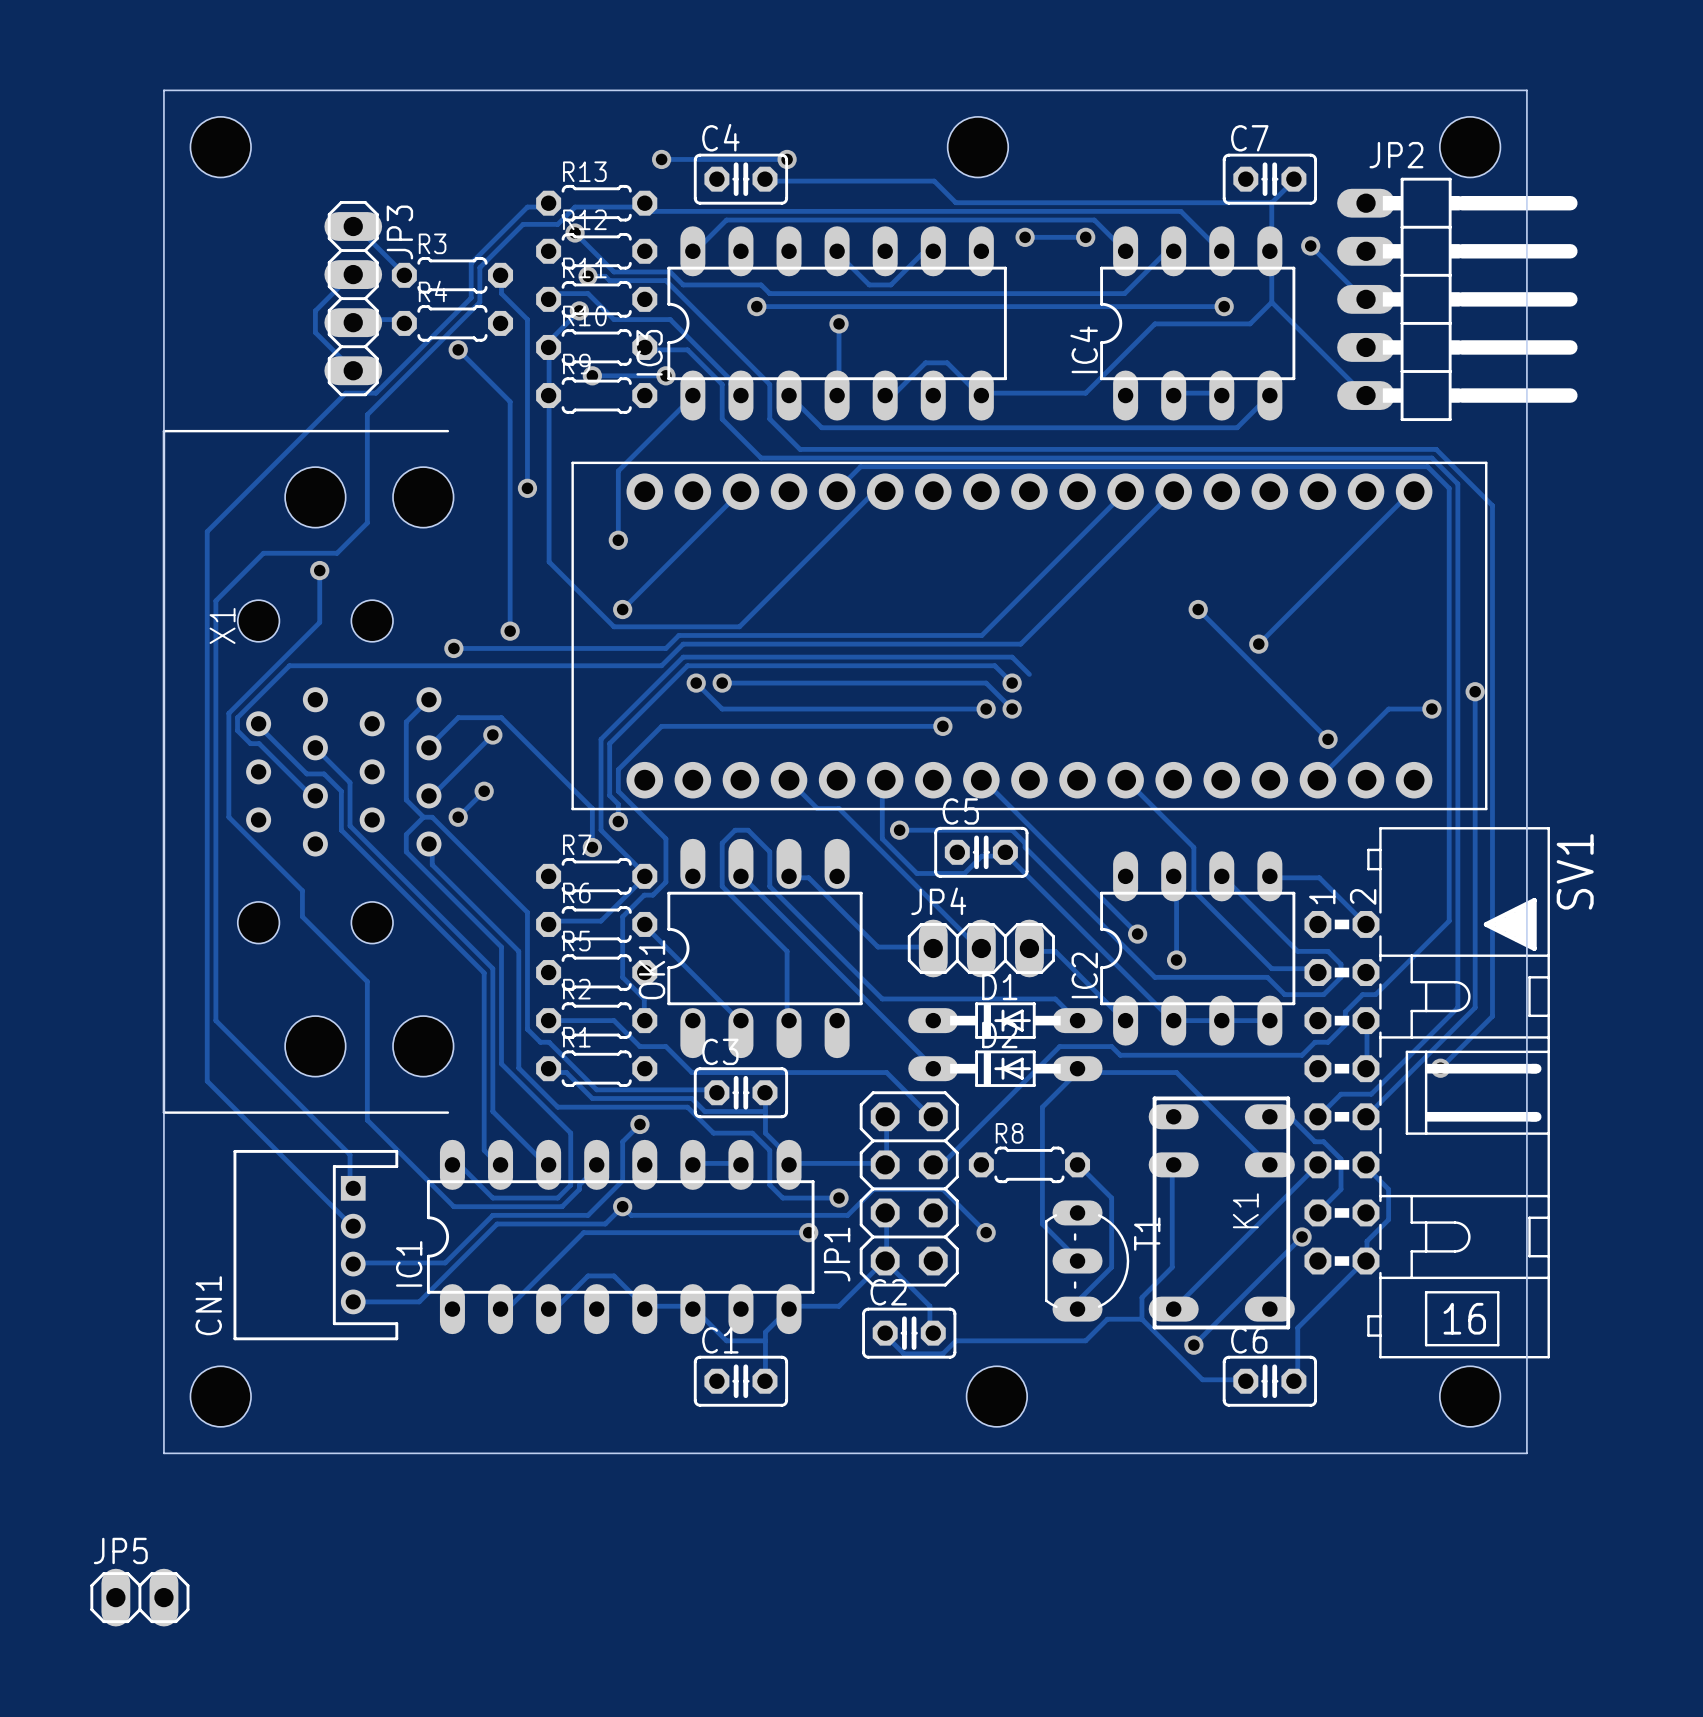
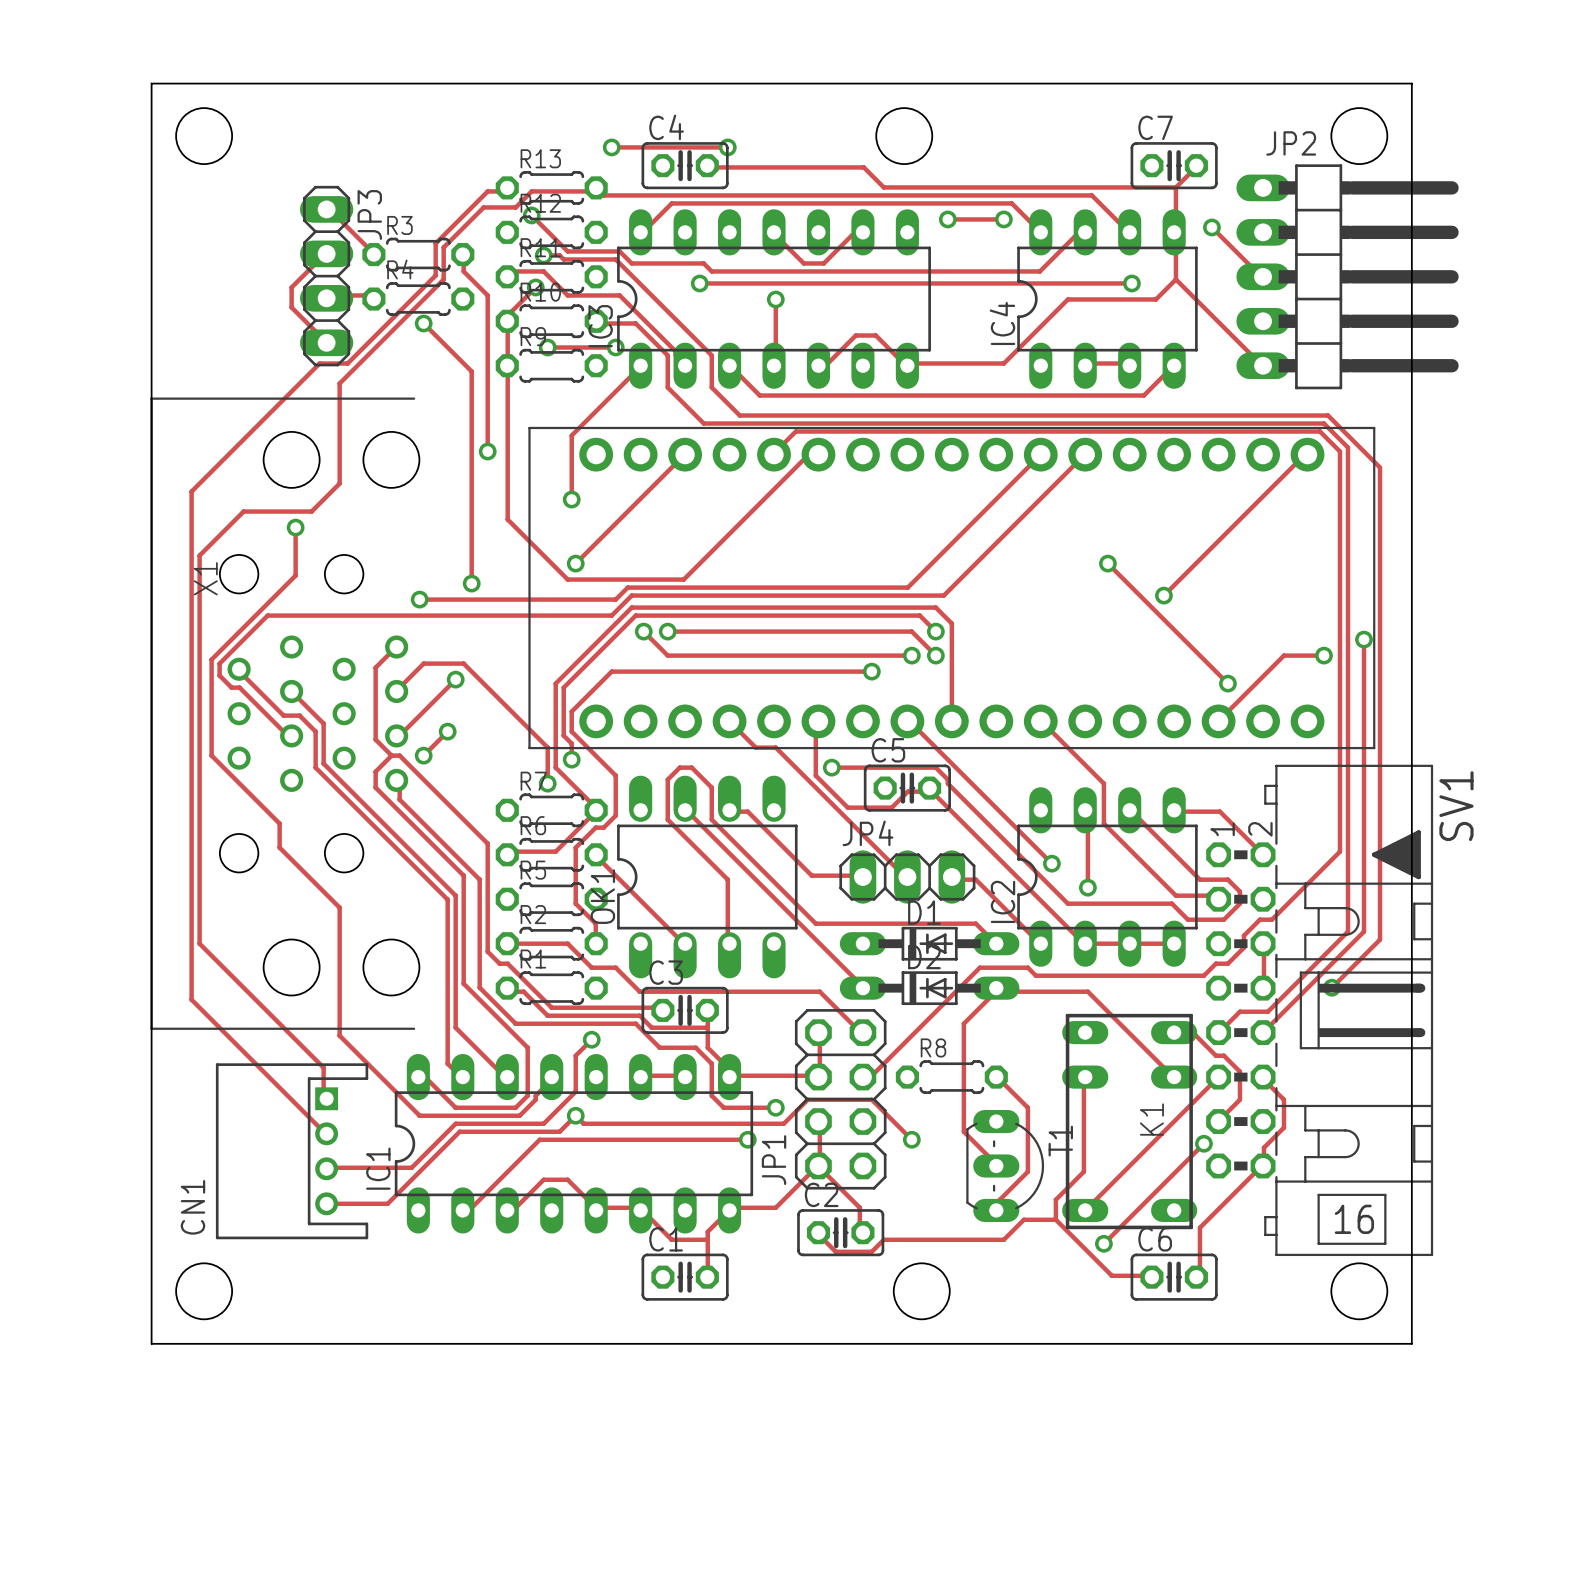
track: none -> (951, 623) (951, 721)
JP5: (139, 1597) -> none

